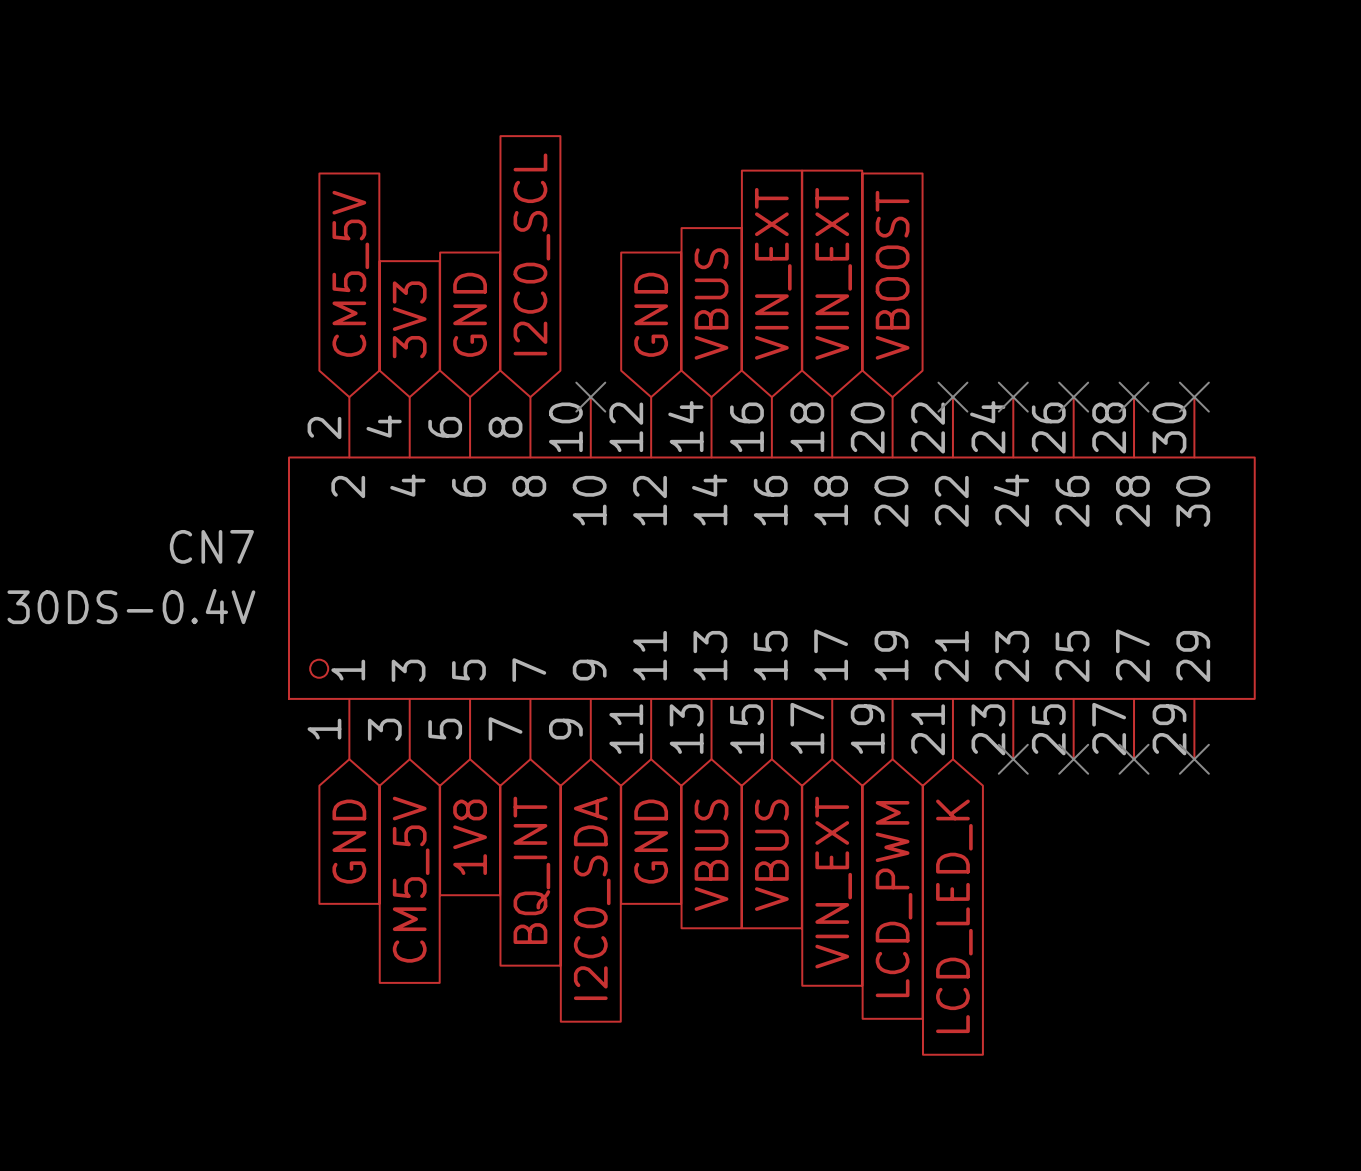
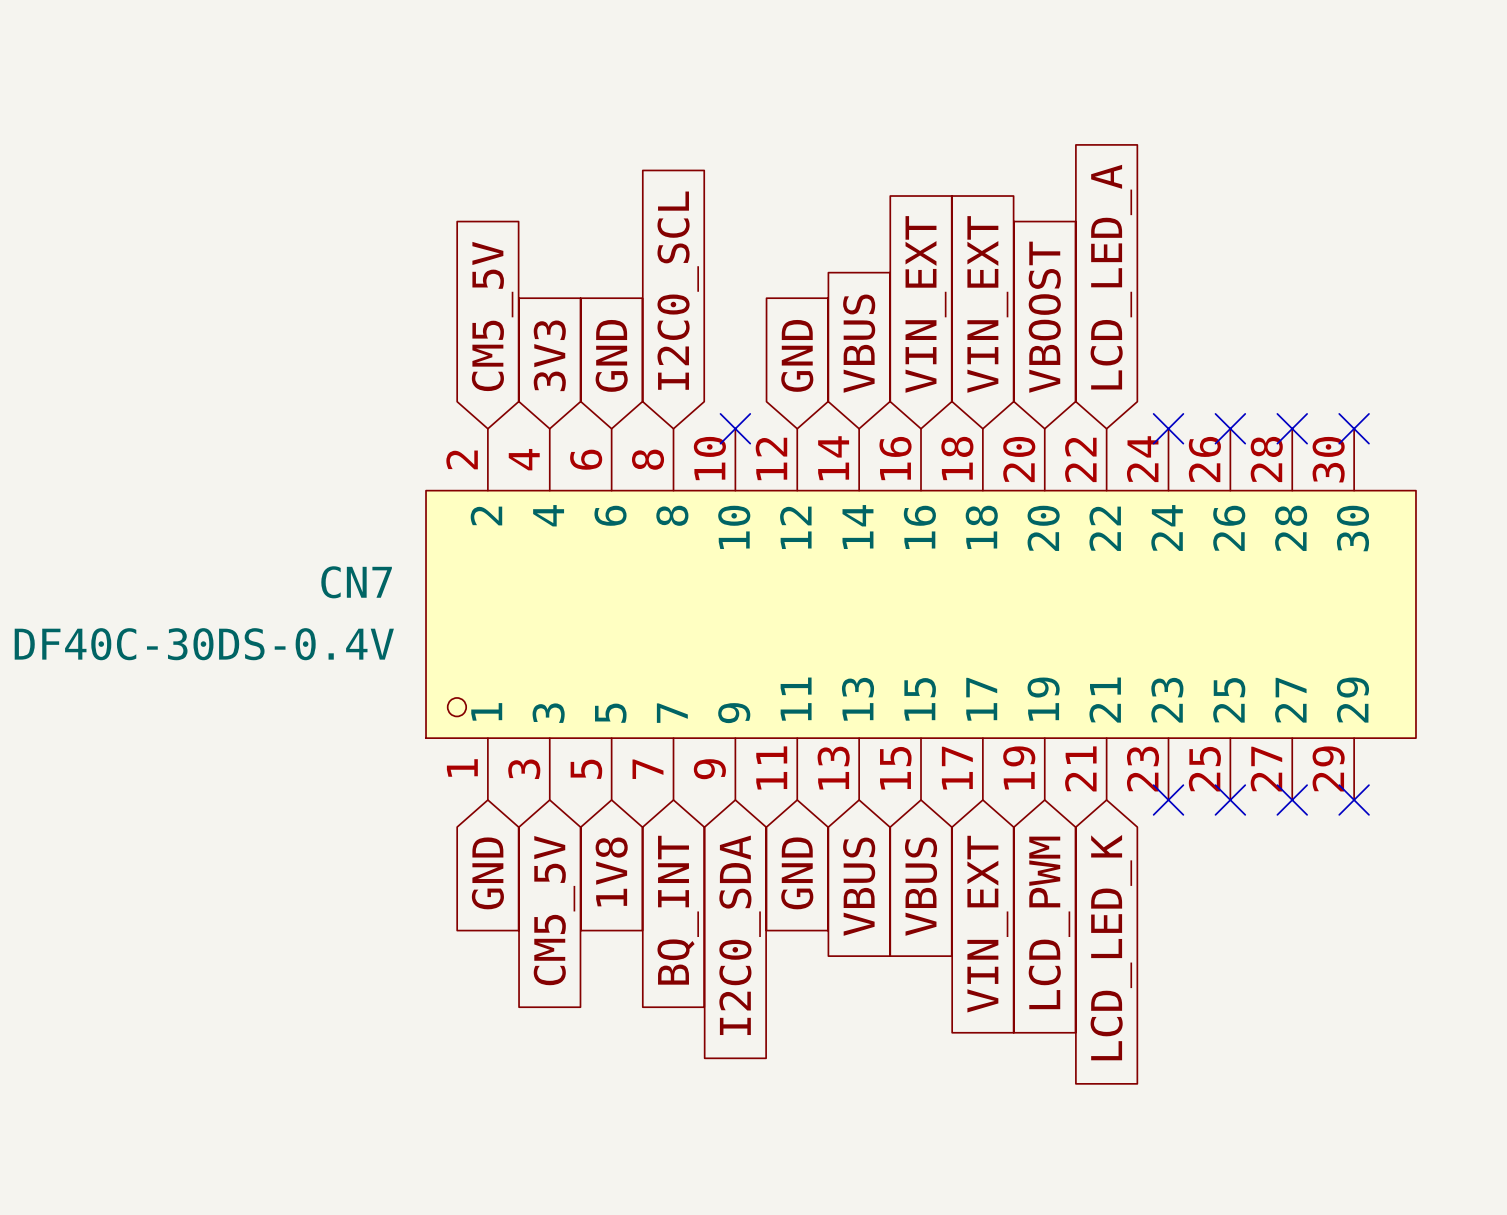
global label: none -> LCD_LED_A (1111, 277)
no-connect mark: (952, 397) -> none

